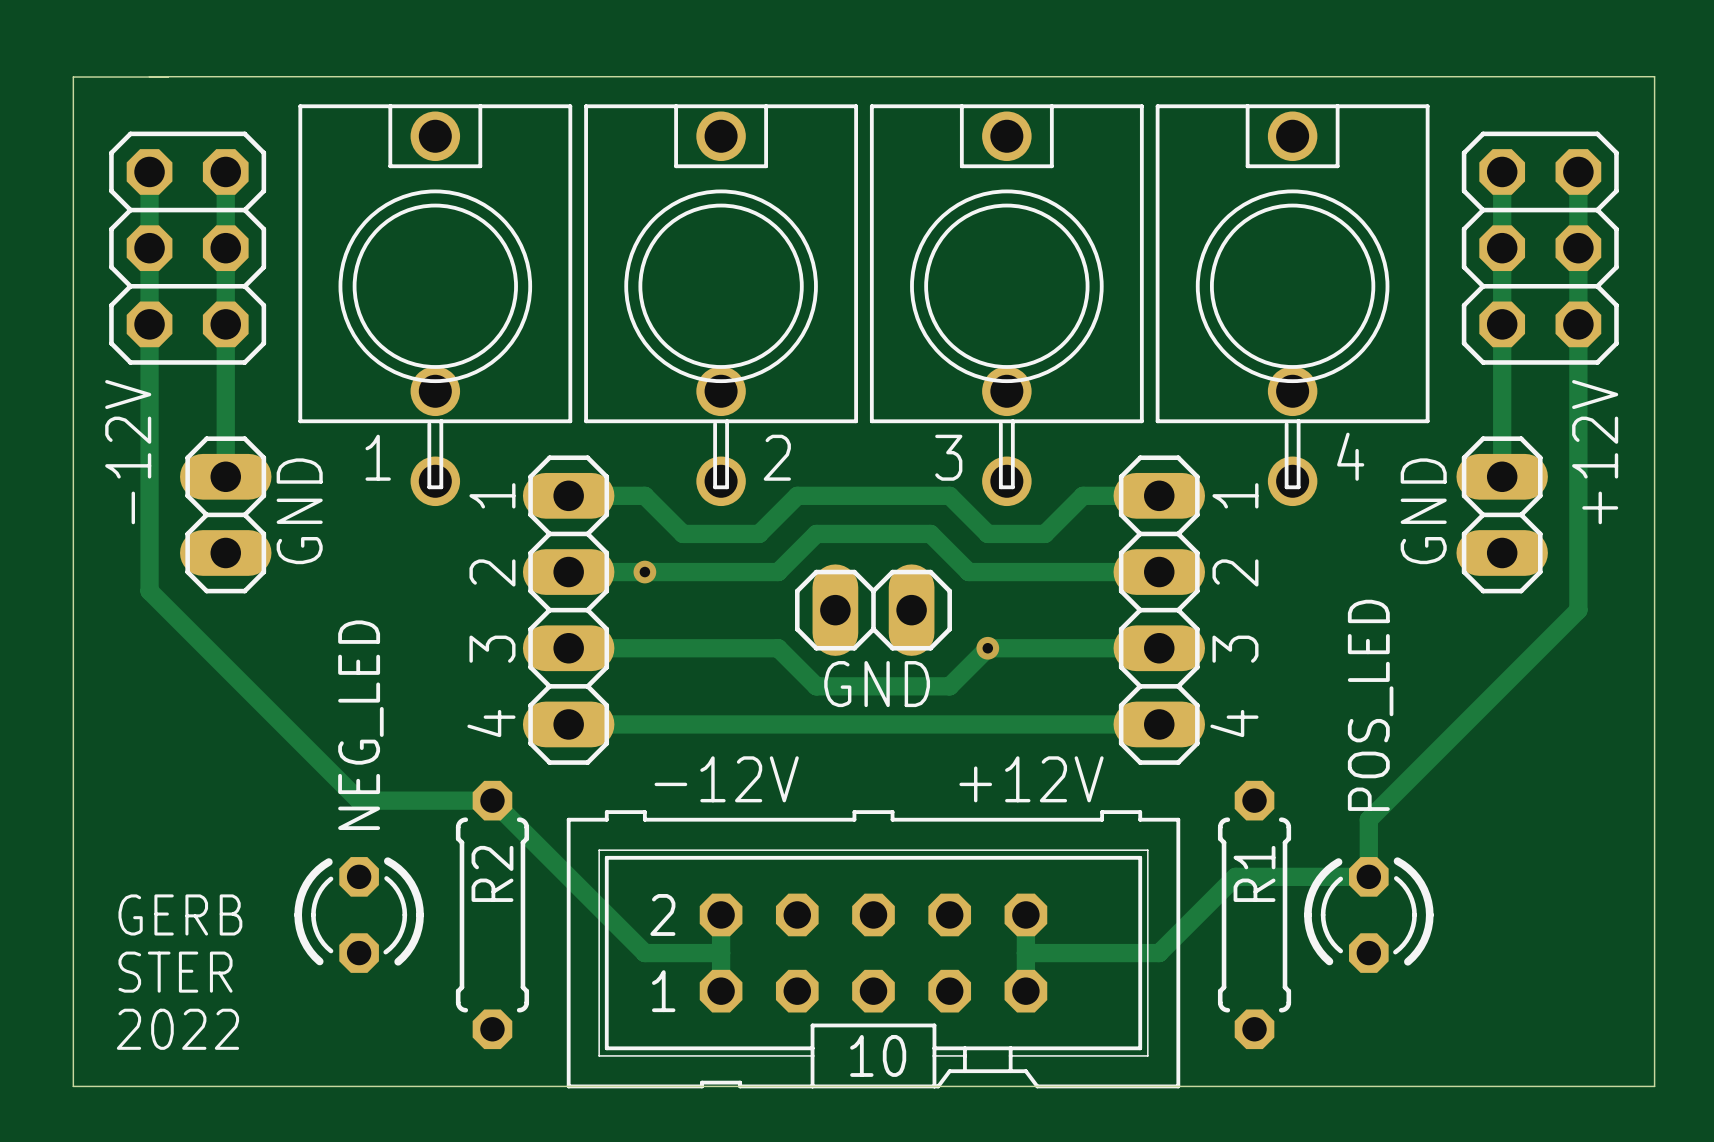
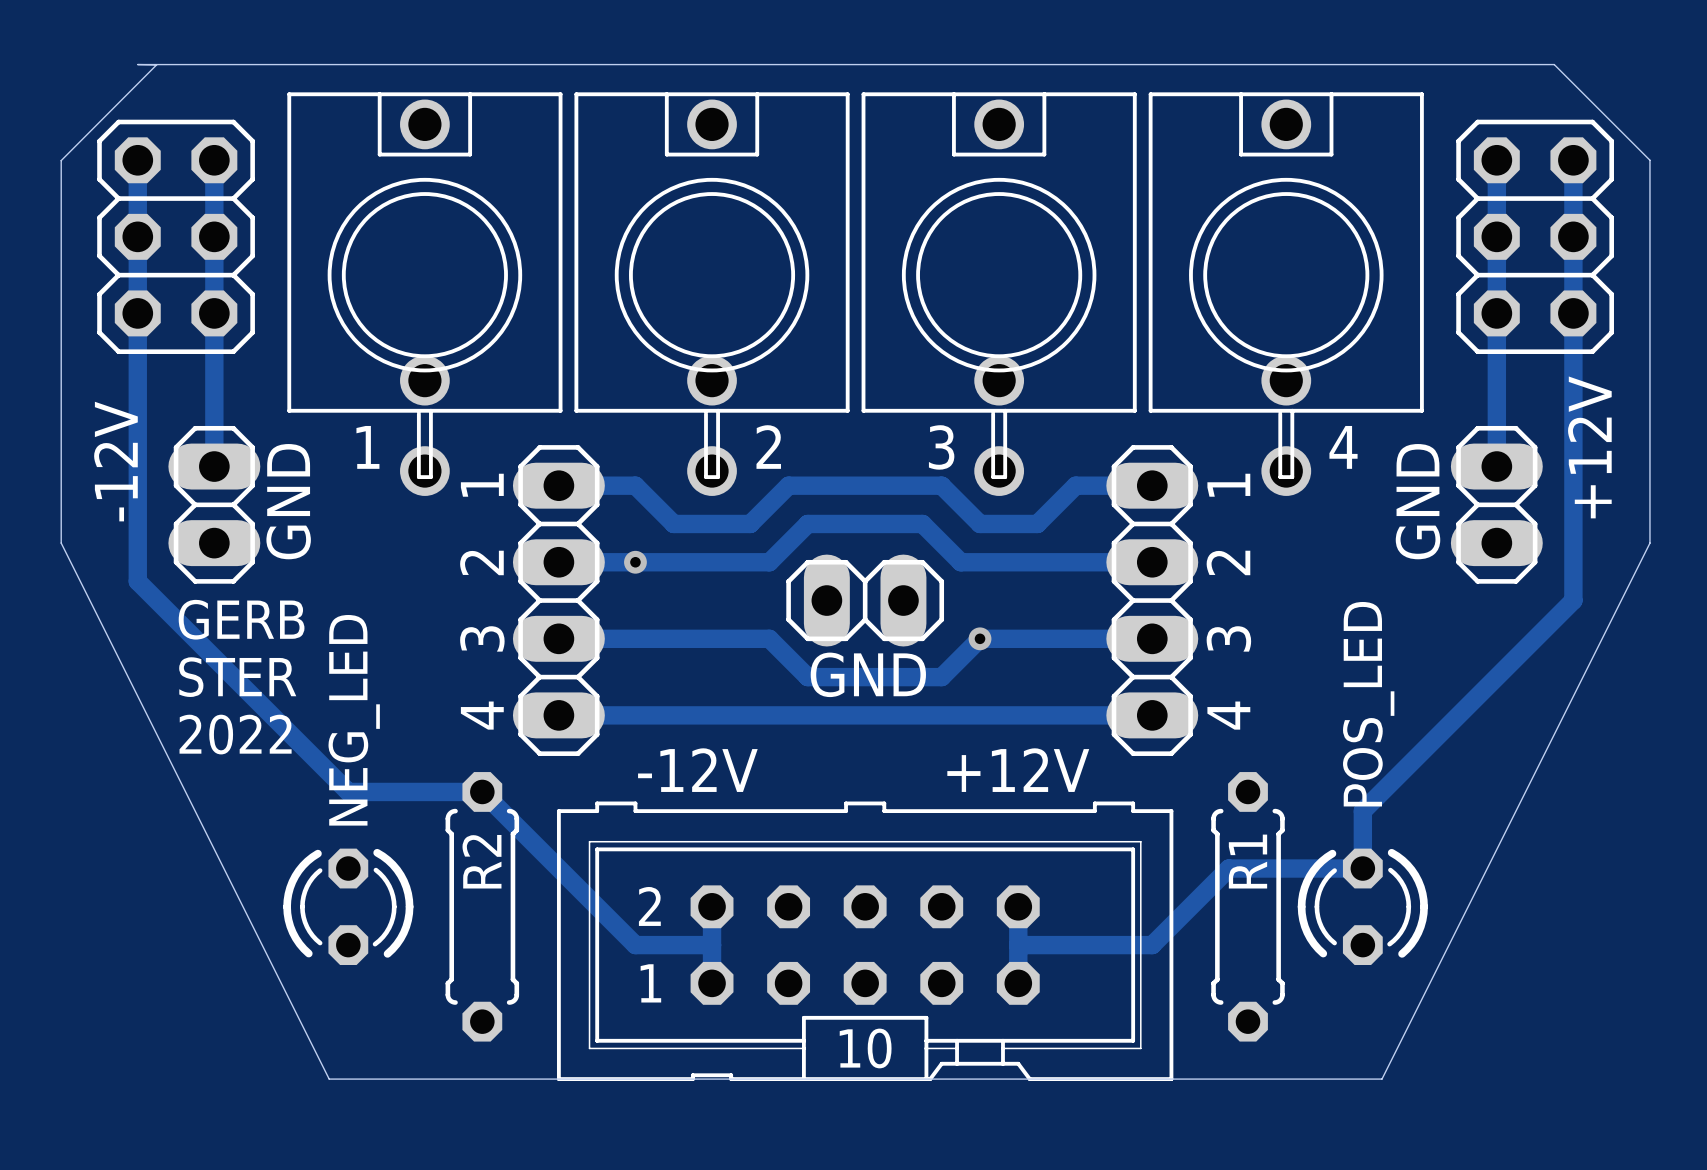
board edge: (1559, 76) (1654, 76) (1654, 171) -> (1554, 64) (1649, 160)
board edge: (168, 77) (73, 77) (73, 172) -> (156, 64) (61, 160)
board edge: (73, 552) (73, 1086) (340, 1086) -> (61, 543) (329, 1079)
board edge: (1654, 552) (1654, 1086) (1387, 1086) -> (1649, 543) (1381, 1079)
text position: GERB (180, 914) -> GERB (241, 619)
text position: STER (175, 972) -> STER (237, 677)
text position: 2022 (177, 1029) -> 2022 (235, 734)

